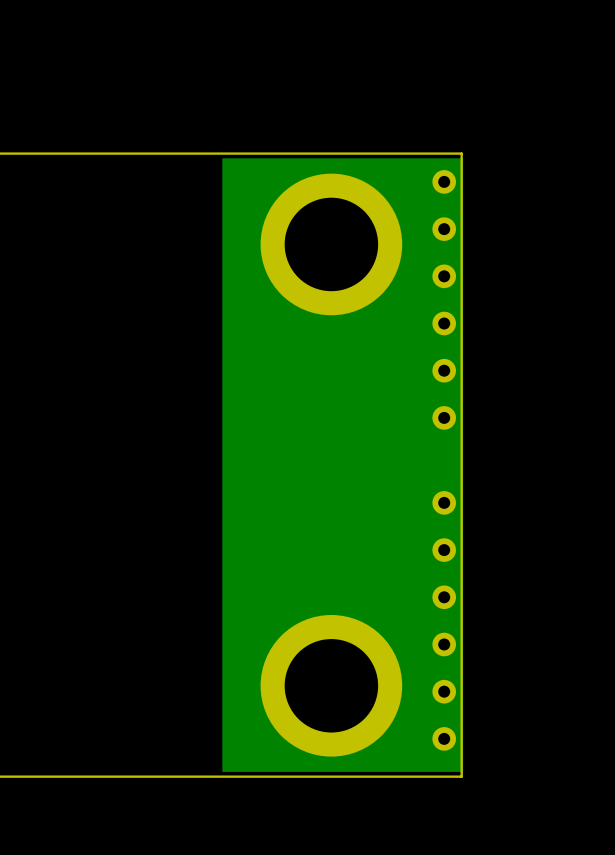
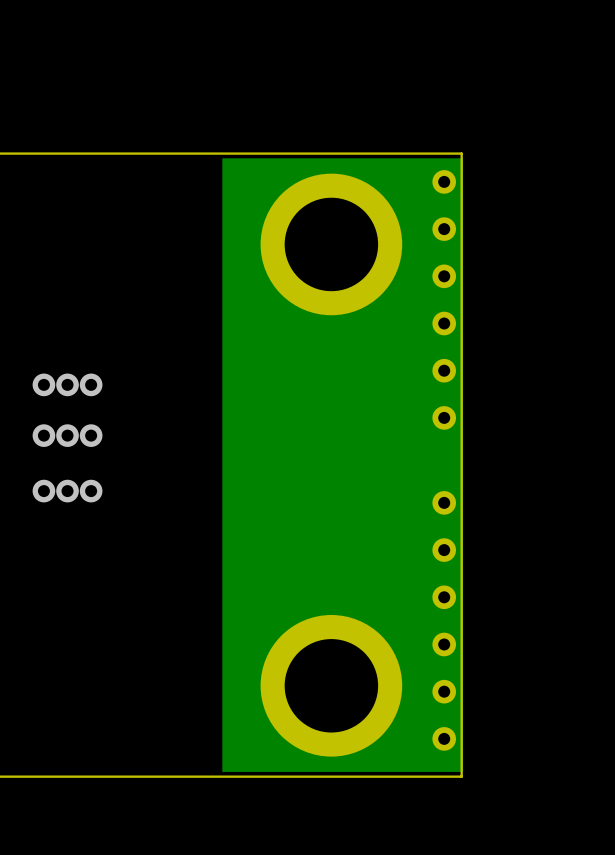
via: none -> (43, 384)
via: none -> (67, 384)
via: none -> (91, 384)
via: none -> (43, 435)
via: none -> (67, 435)
via: none -> (91, 435)
via: none -> (43, 491)
via: none -> (67, 491)
via: none -> (91, 491)

